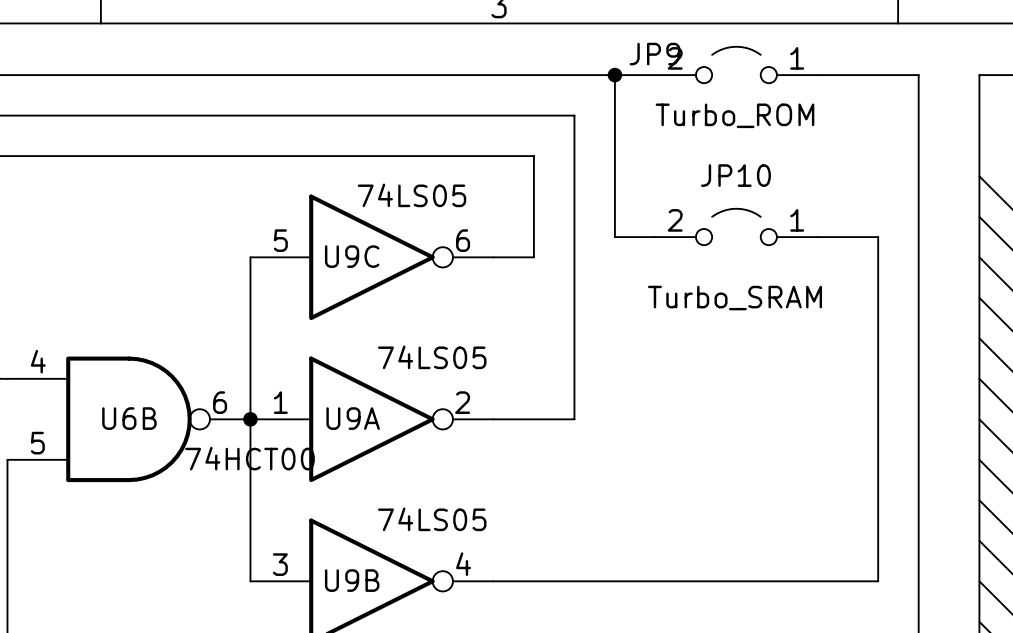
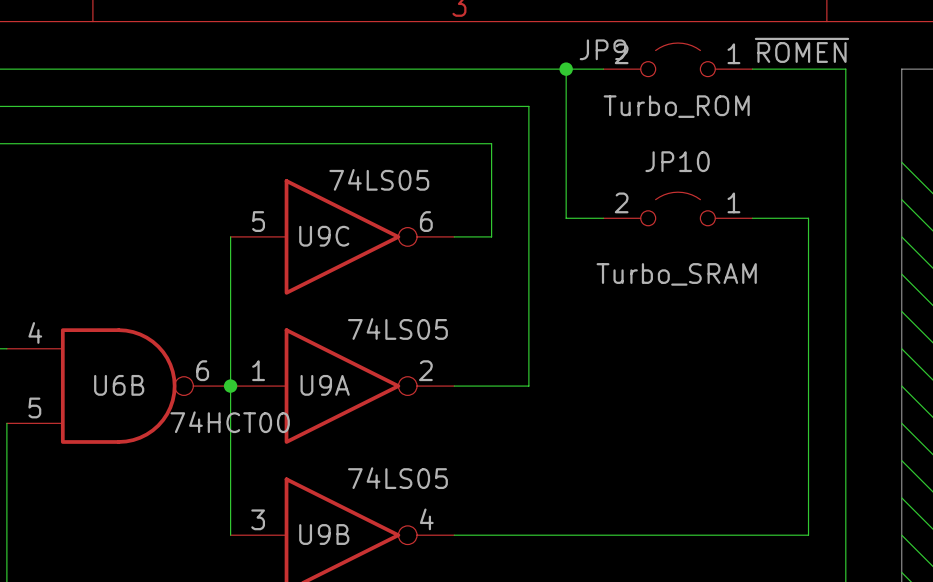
label: none -> ~{ROMEN} (802, 50)

